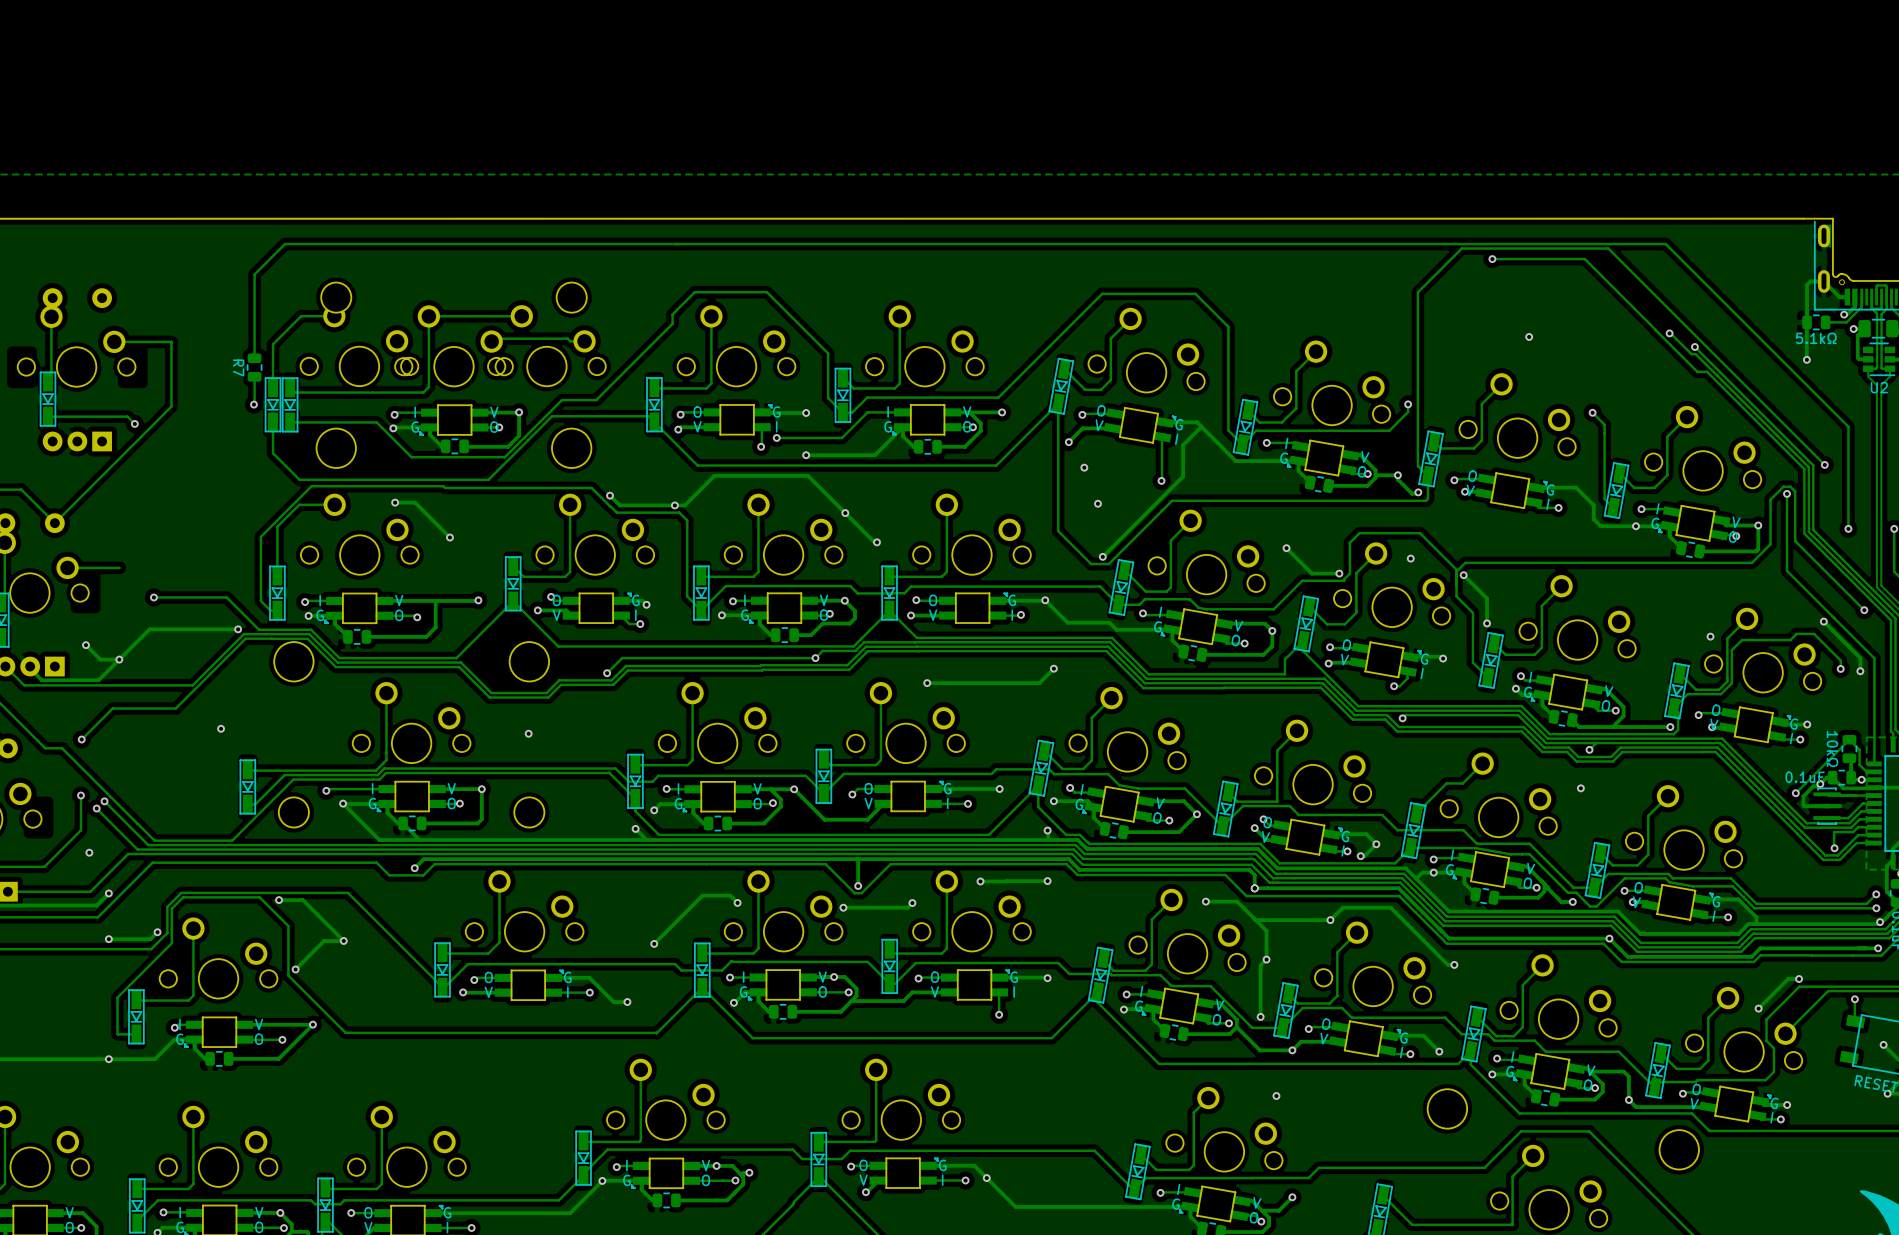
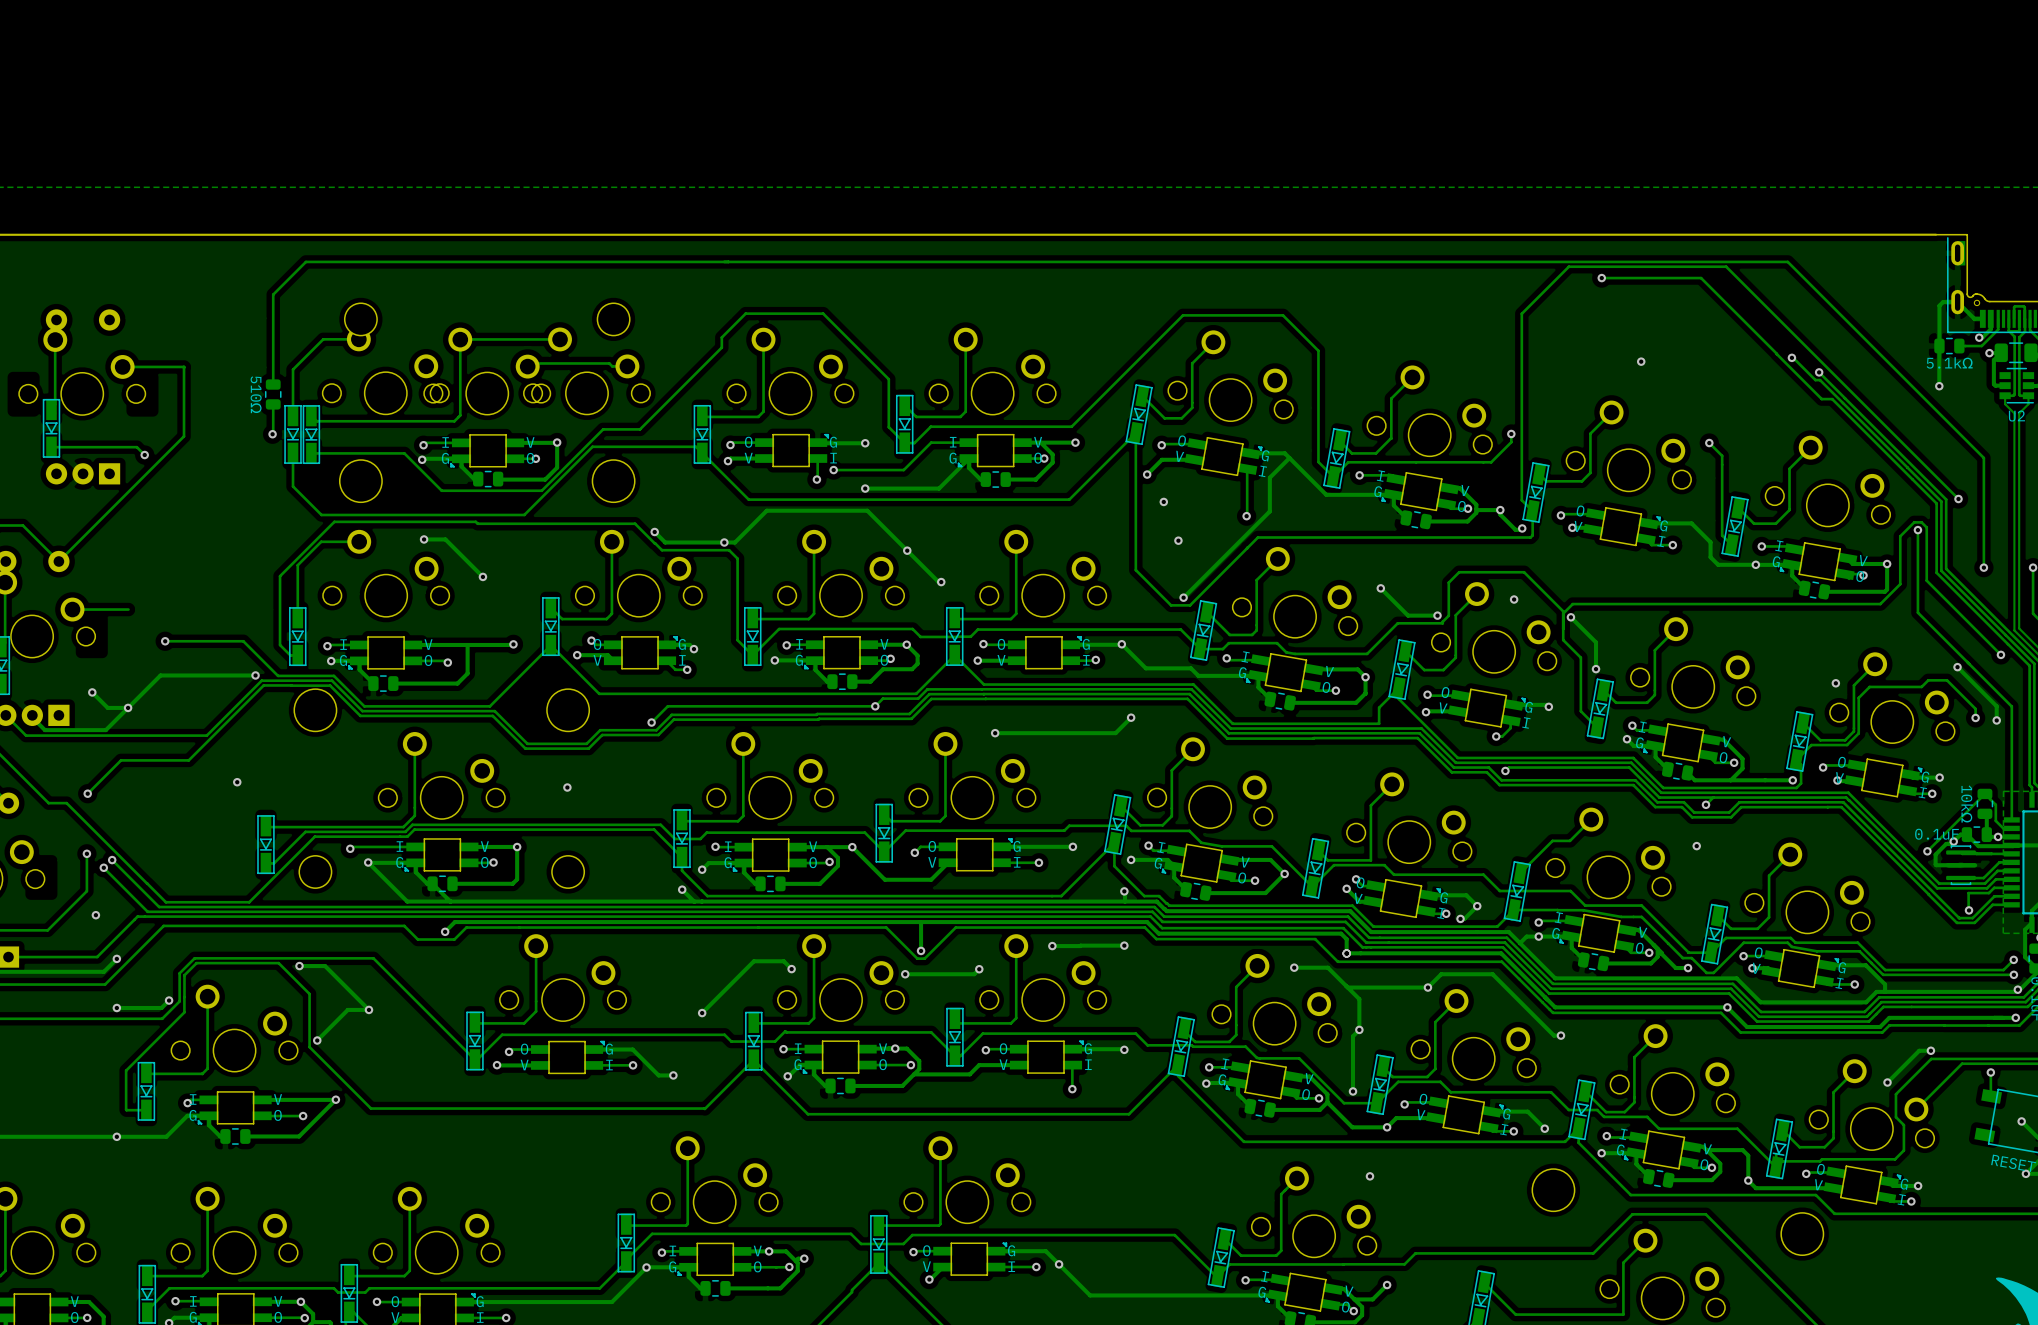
R7 value: none -> 510Ω (256, 394)
R7 name: R7 (238, 368) -> none

